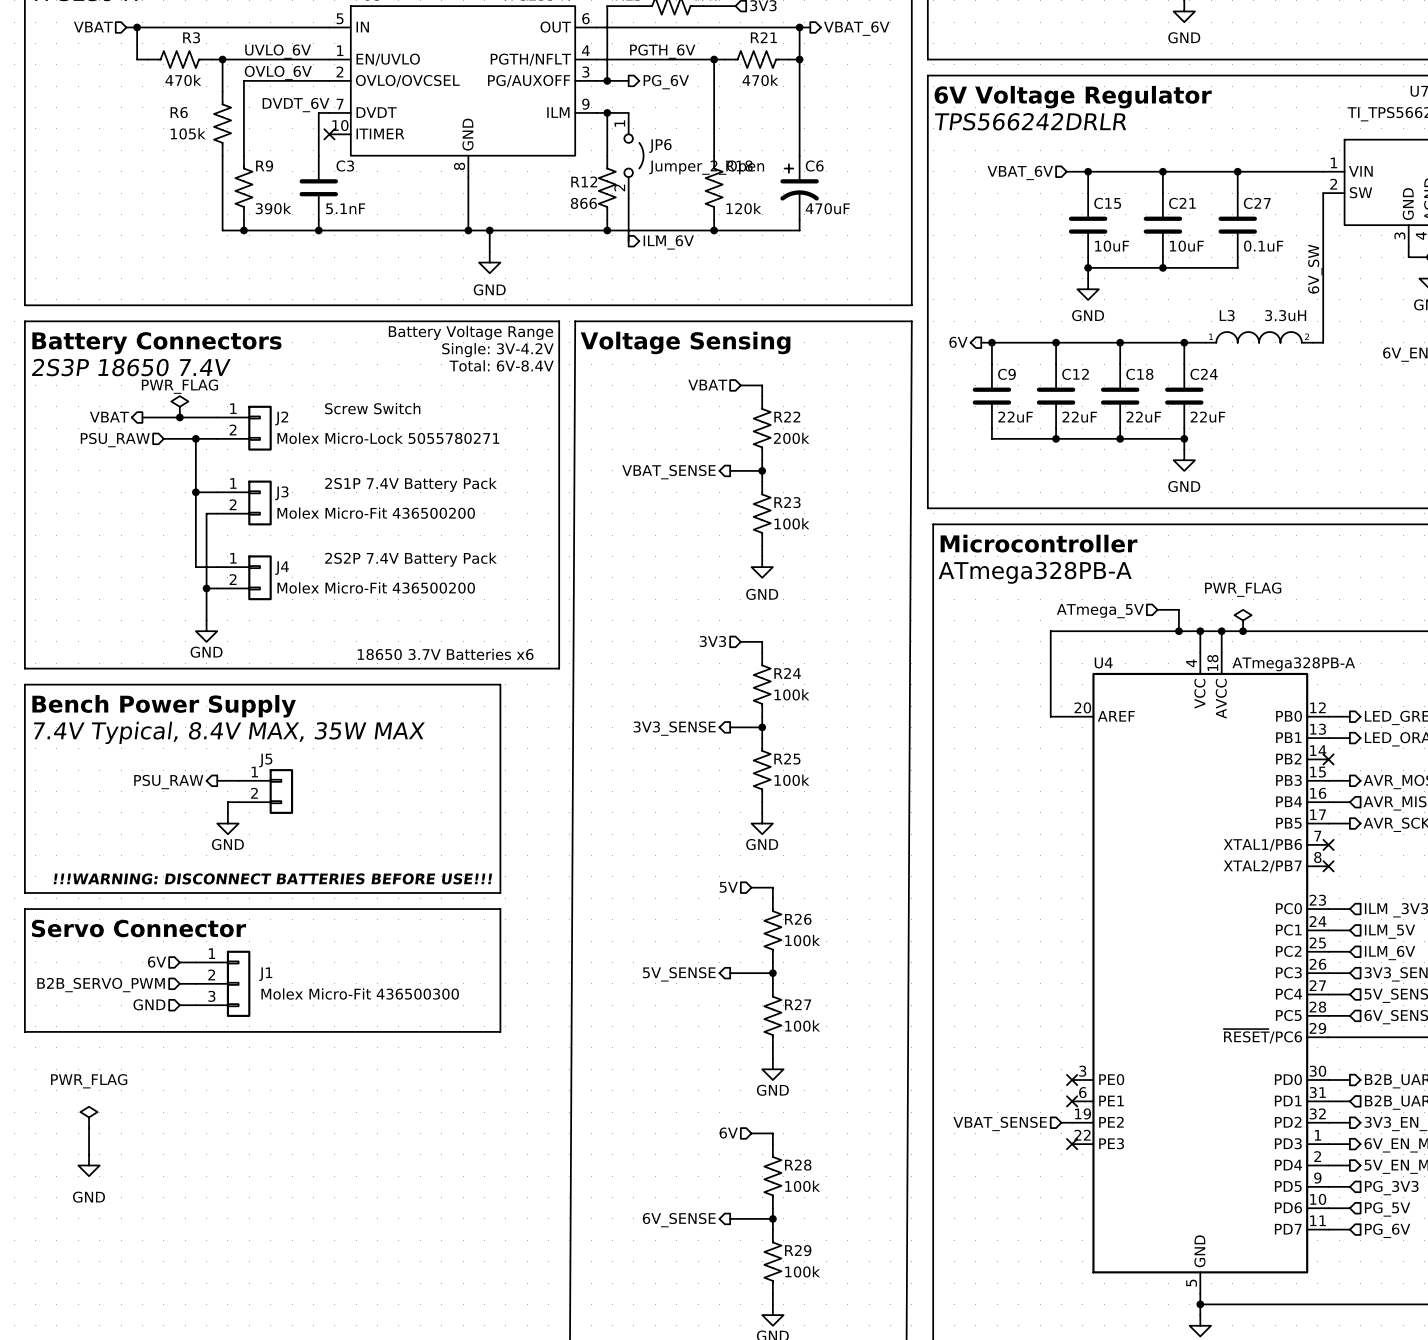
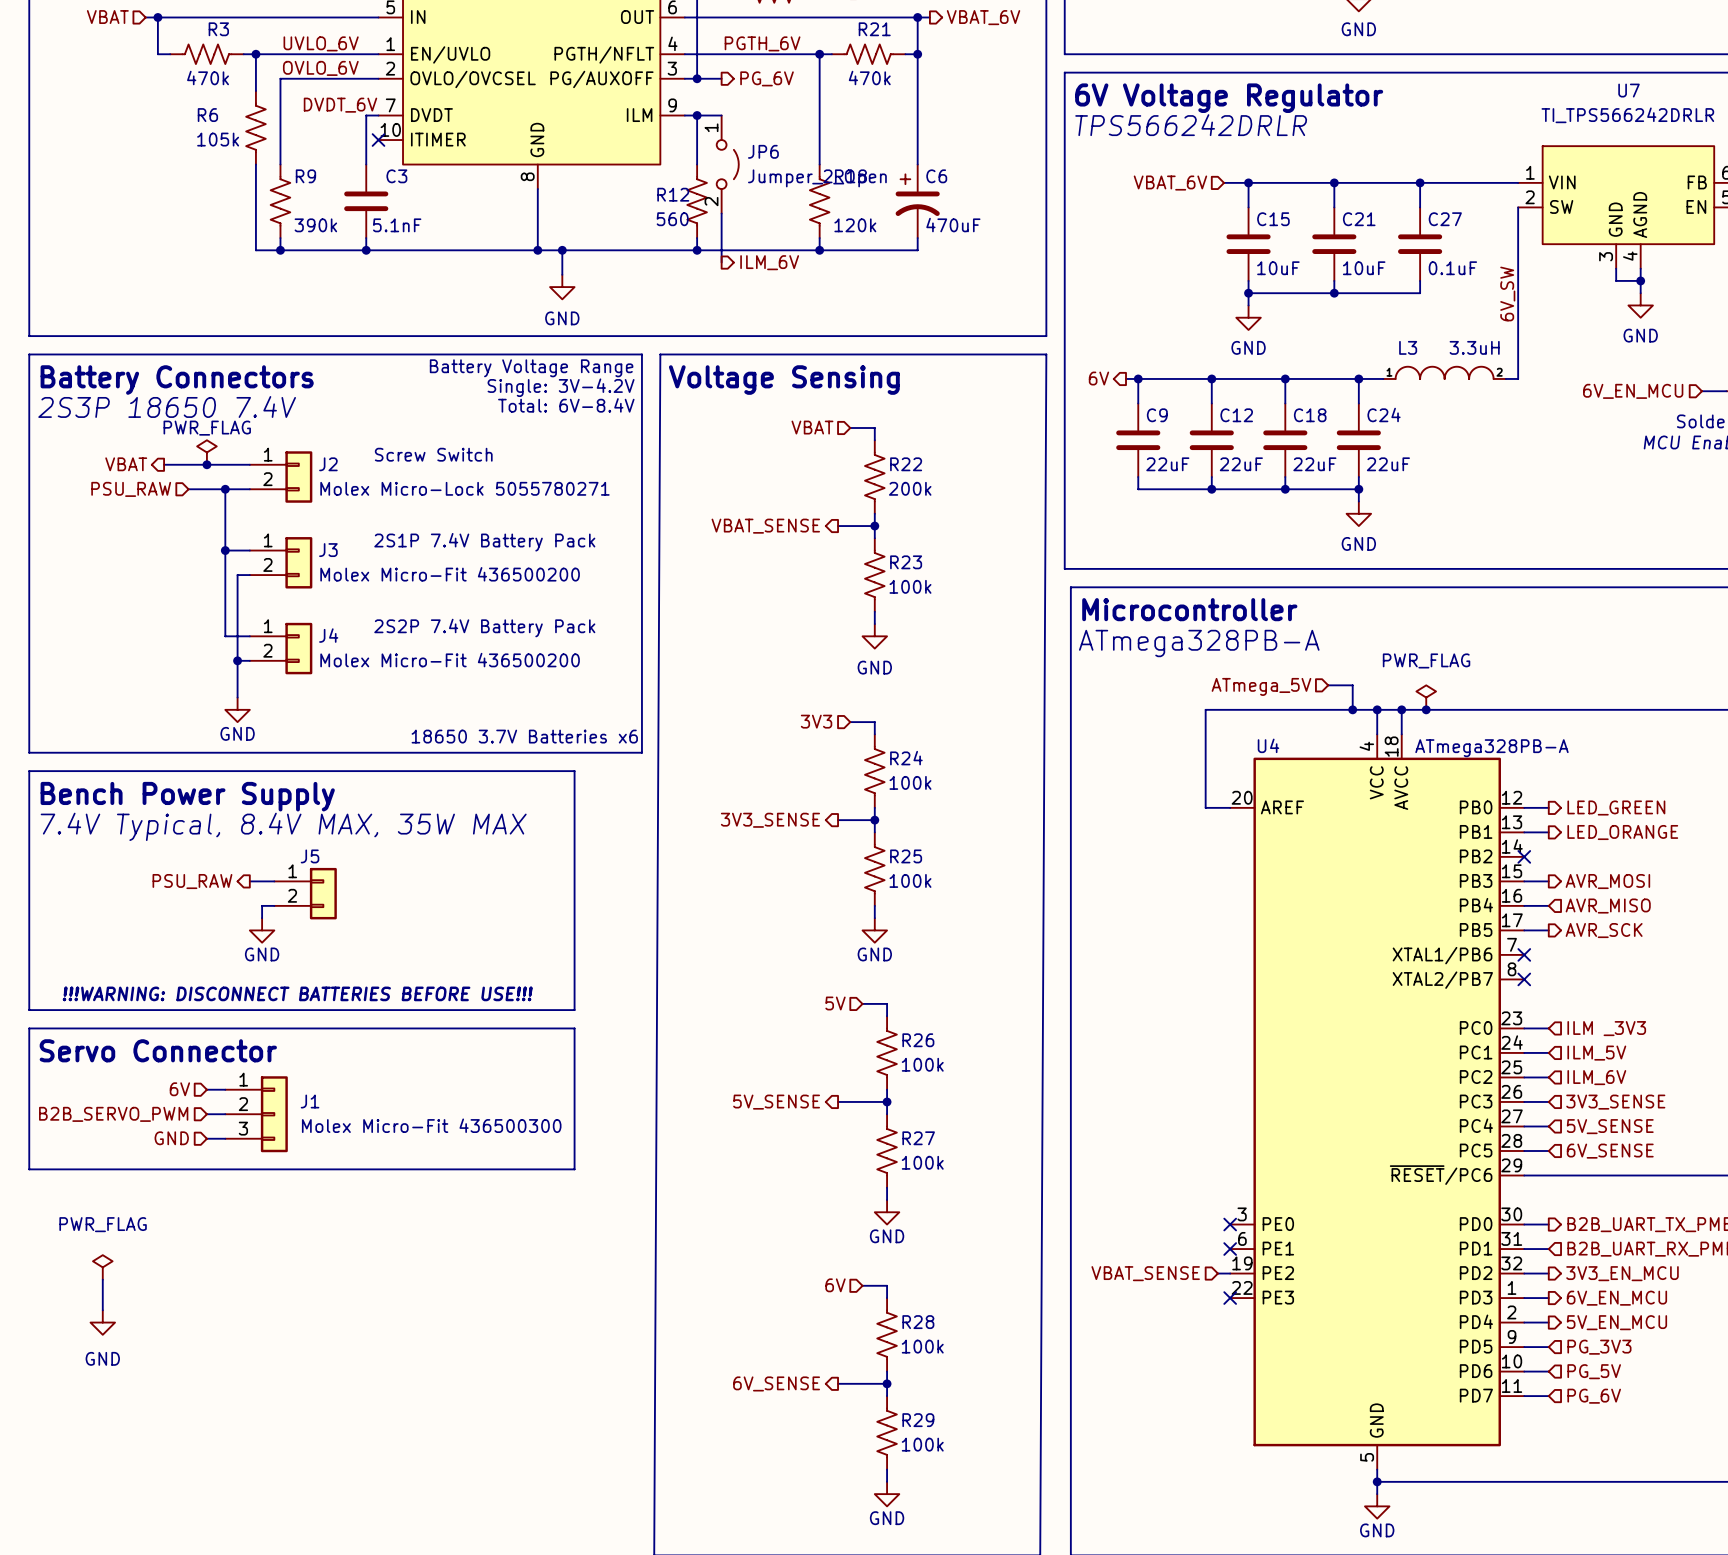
R12 value: 866 (583, 203) -> 560 (672, 219)

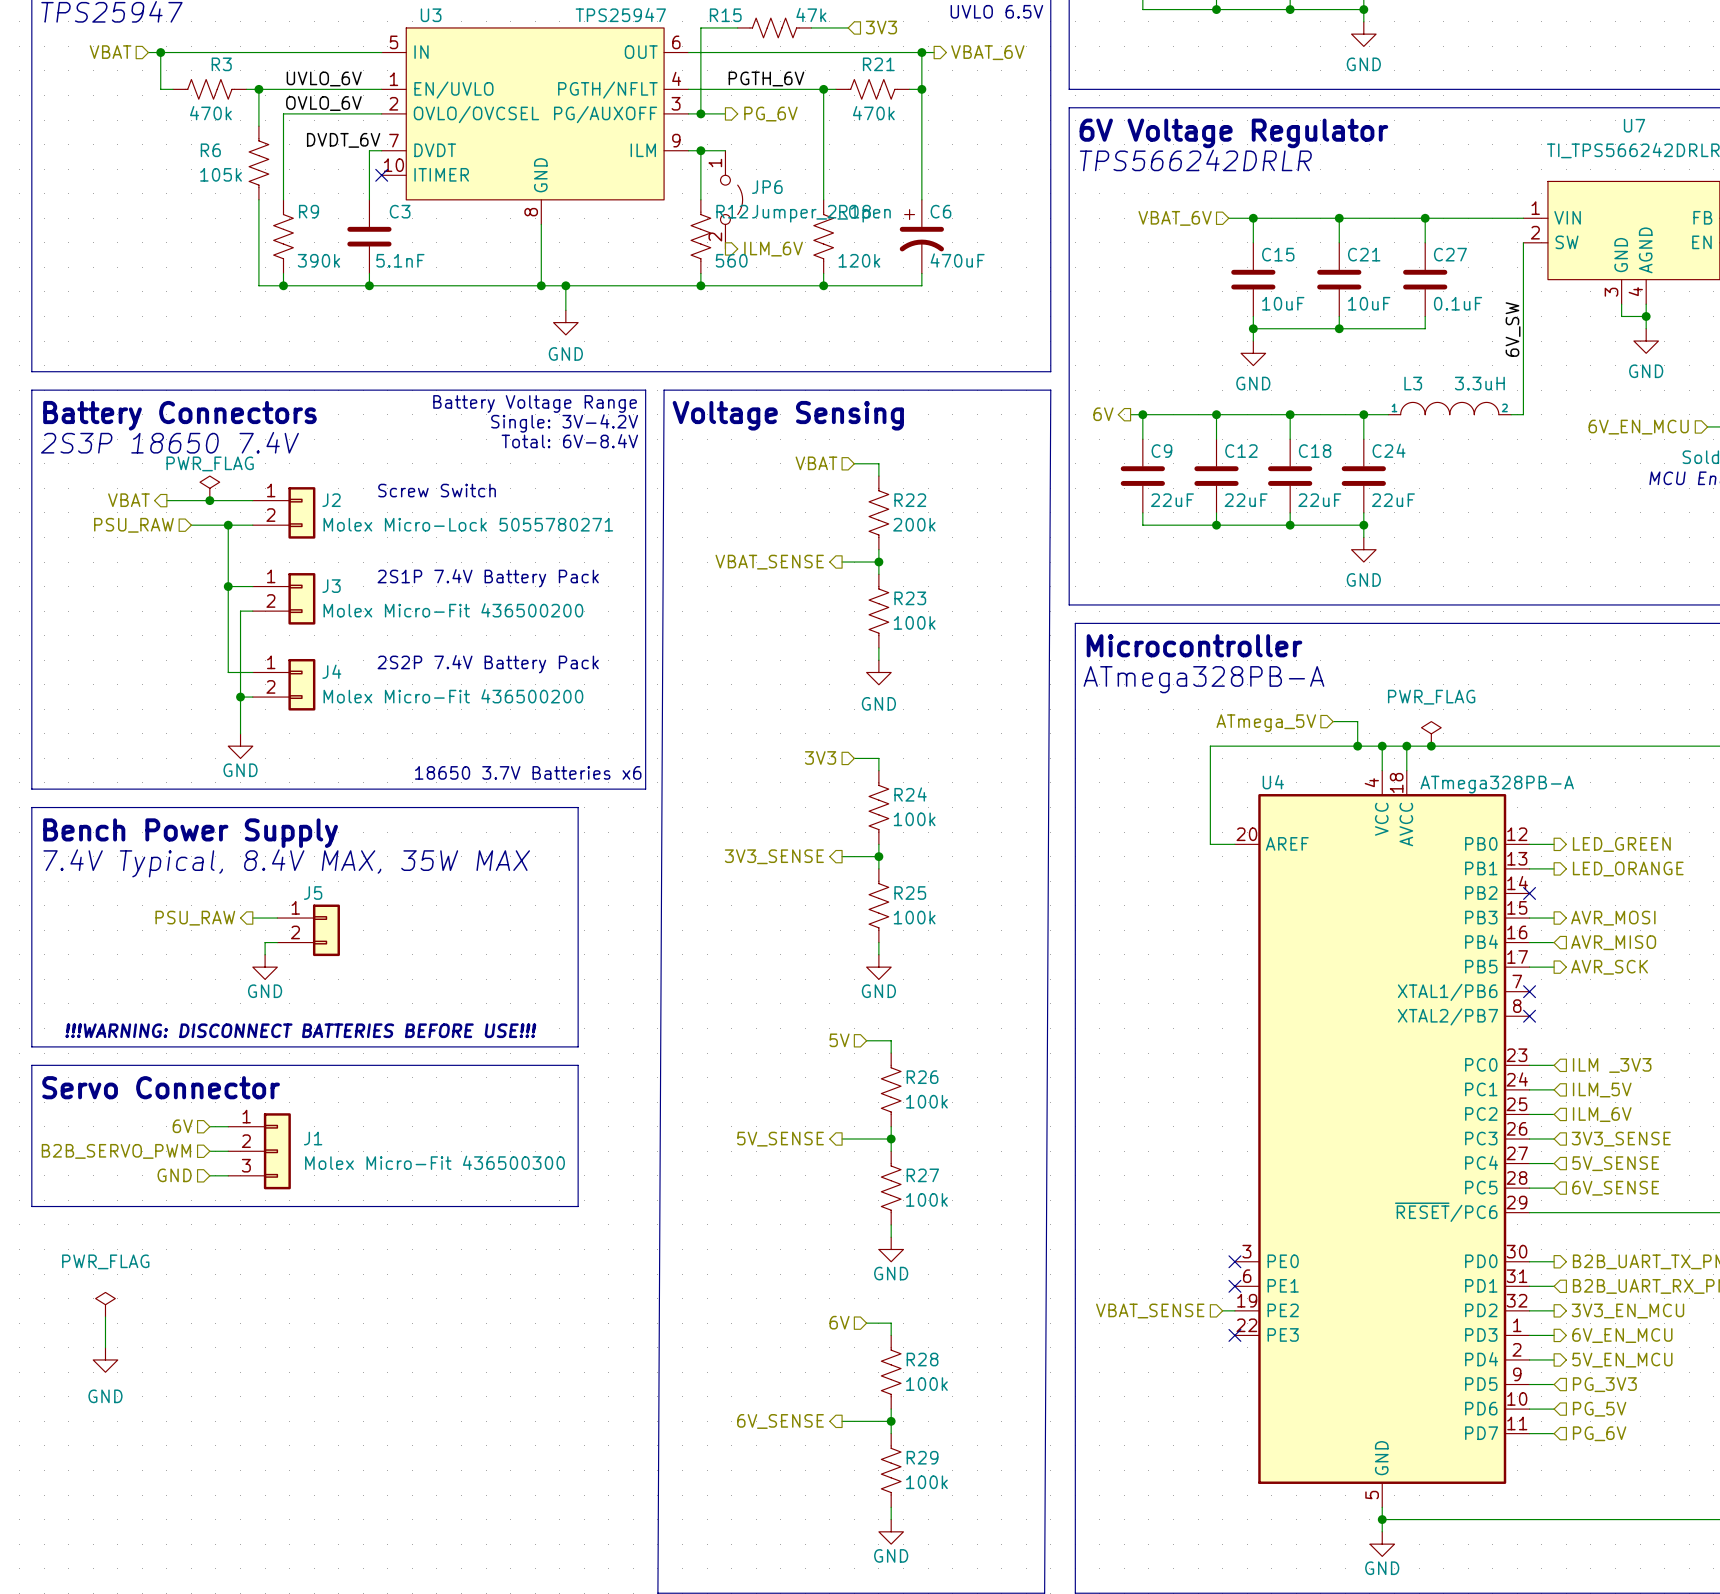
R12 name position: R12 (673, 194) -> R12 (732, 211)
wire: (721, 213) (721, 262) -> none
R12 value position: 560 (672, 219) -> 560 (731, 260)
hierarchical label position: ILM_6V (769, 262) -> ILM_6V (773, 249)

